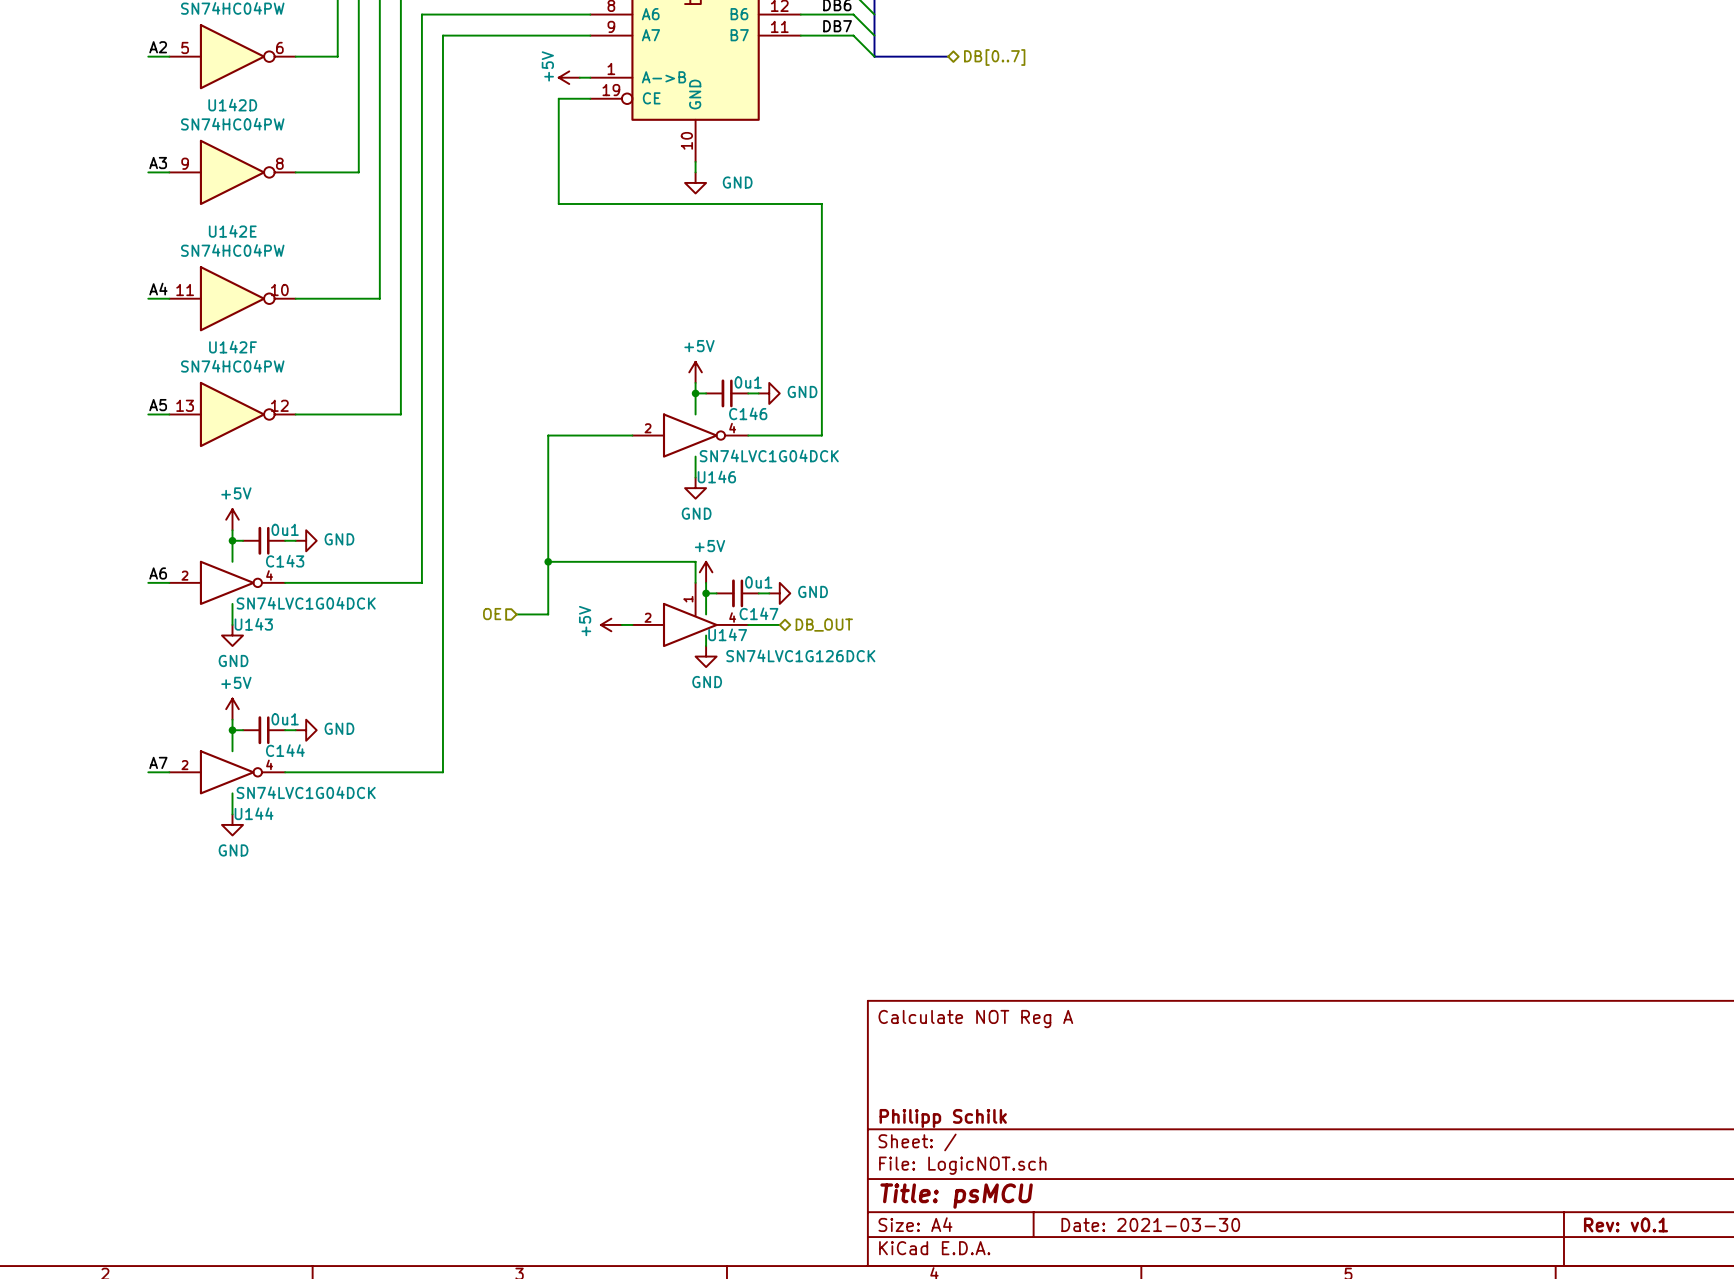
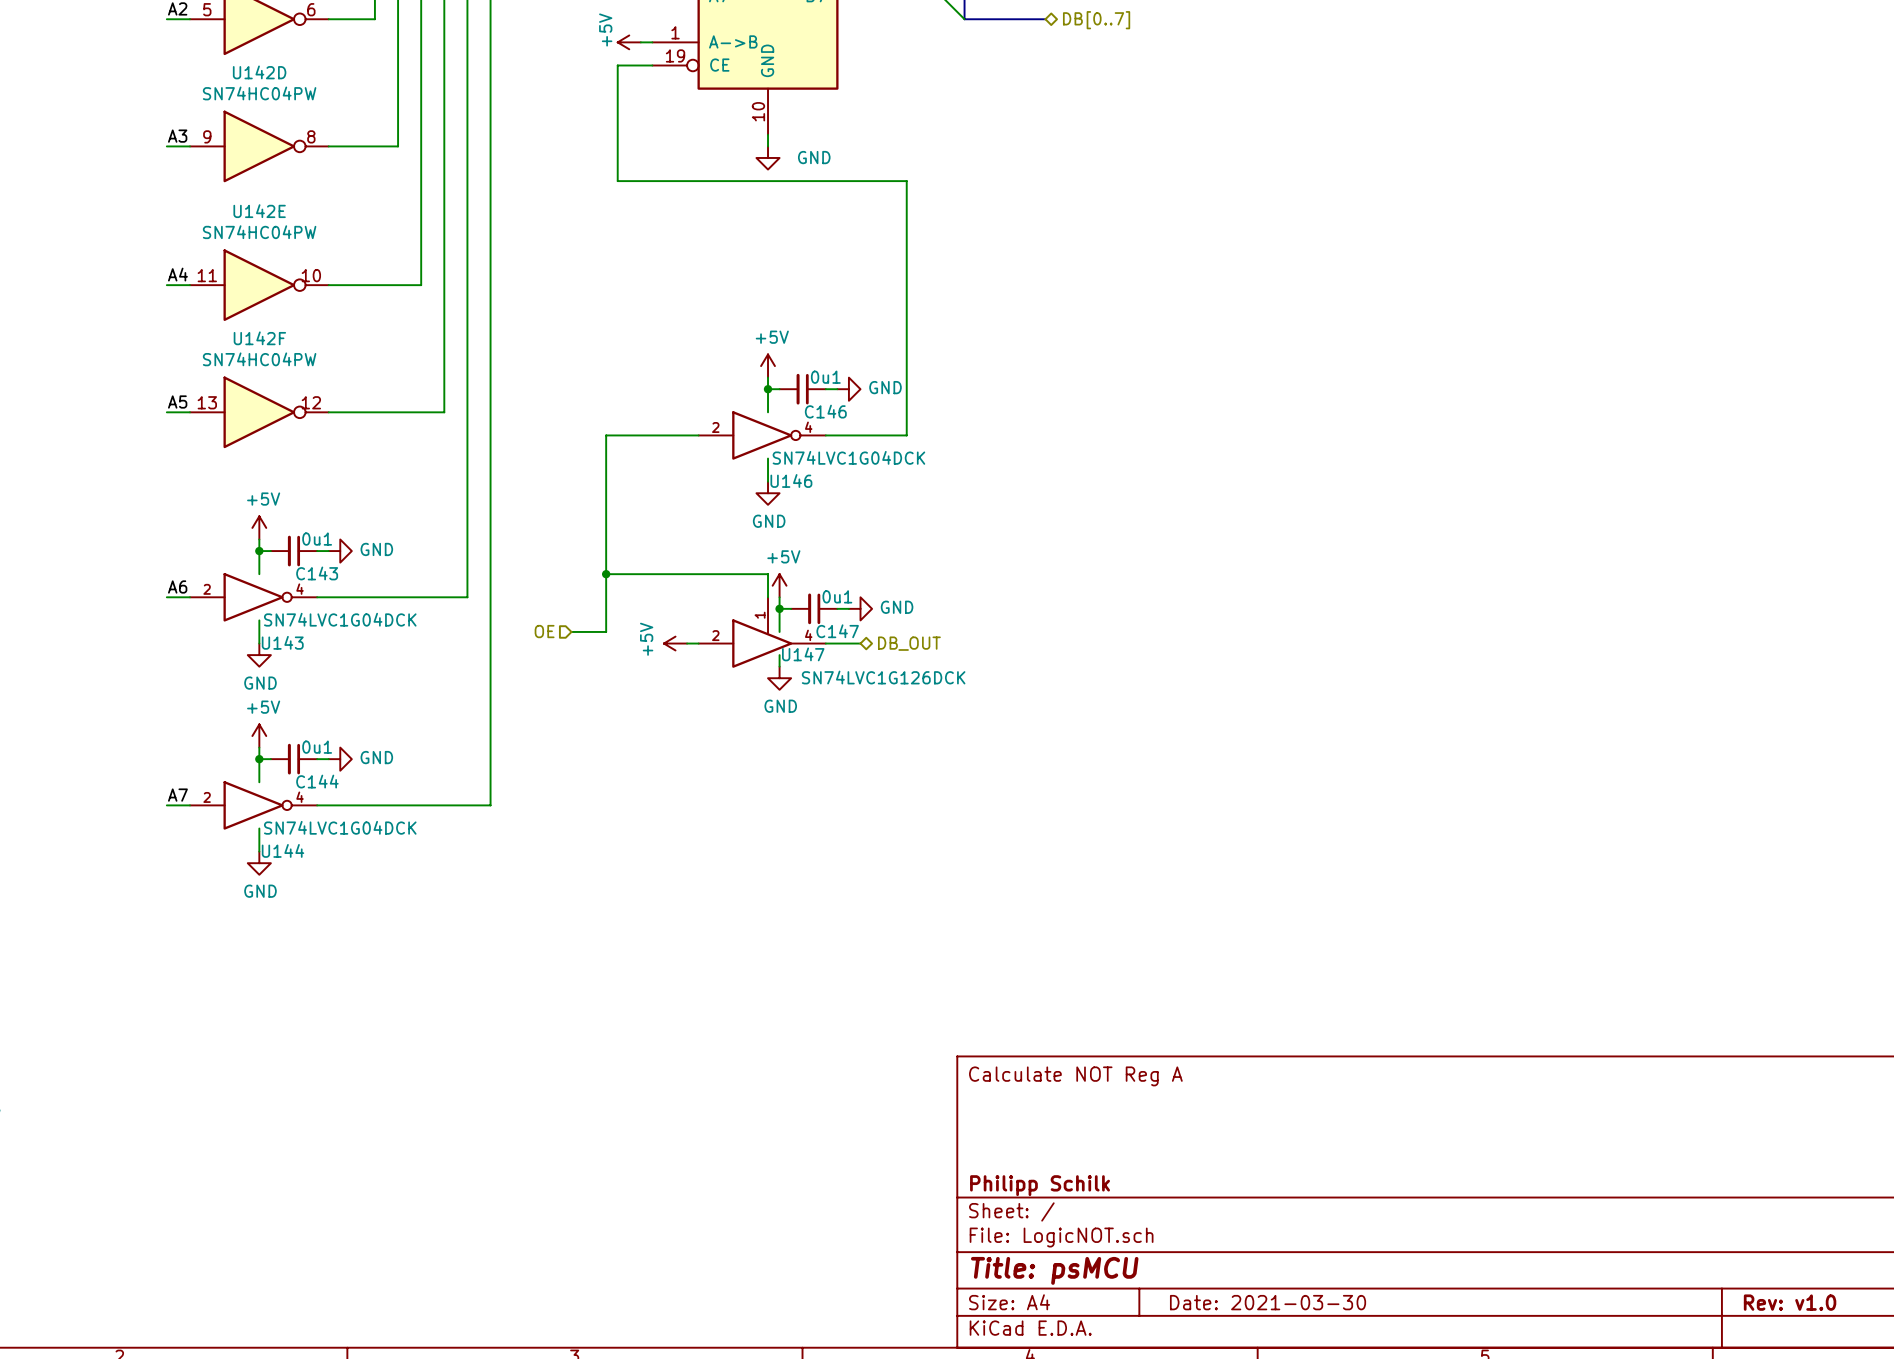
title block: Rev: v0.1 (1626, 1224) -> Rev: v1.0 (1790, 1302)

